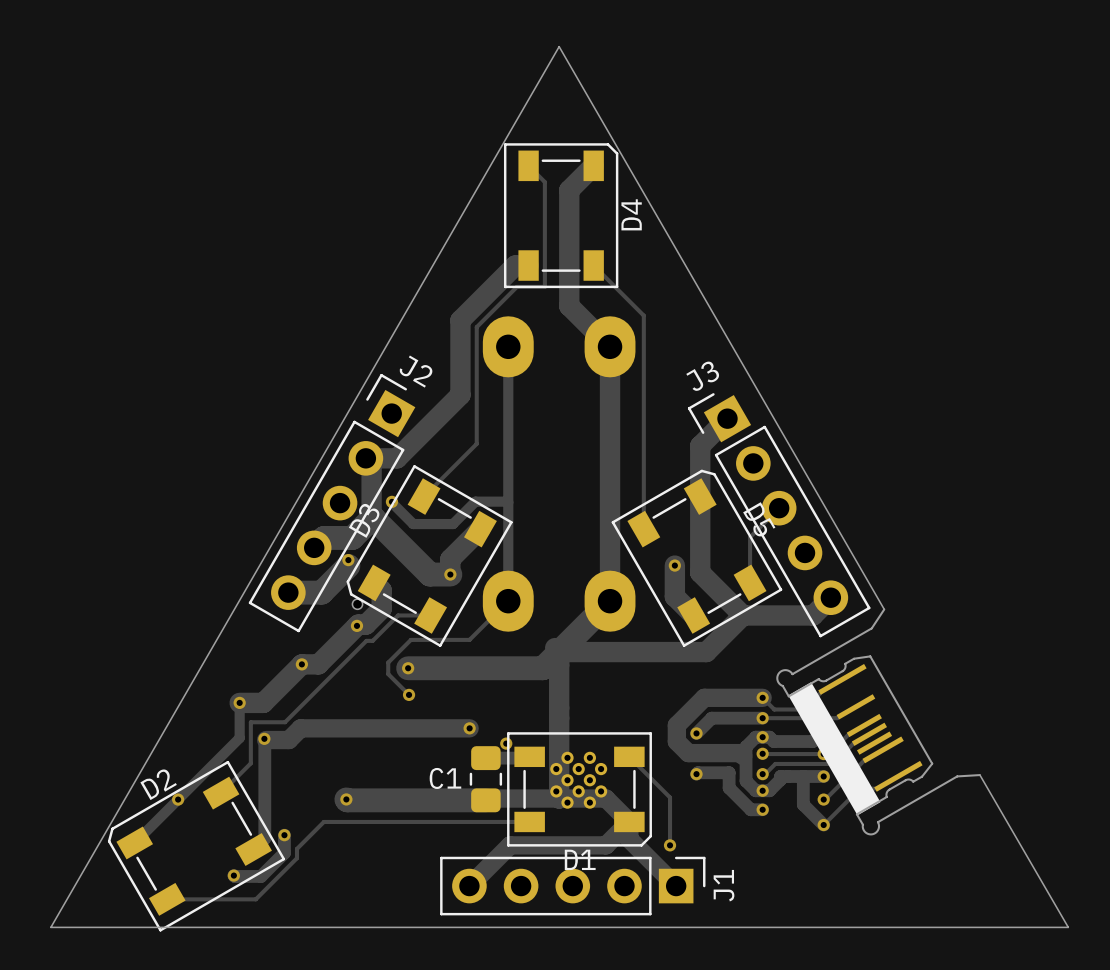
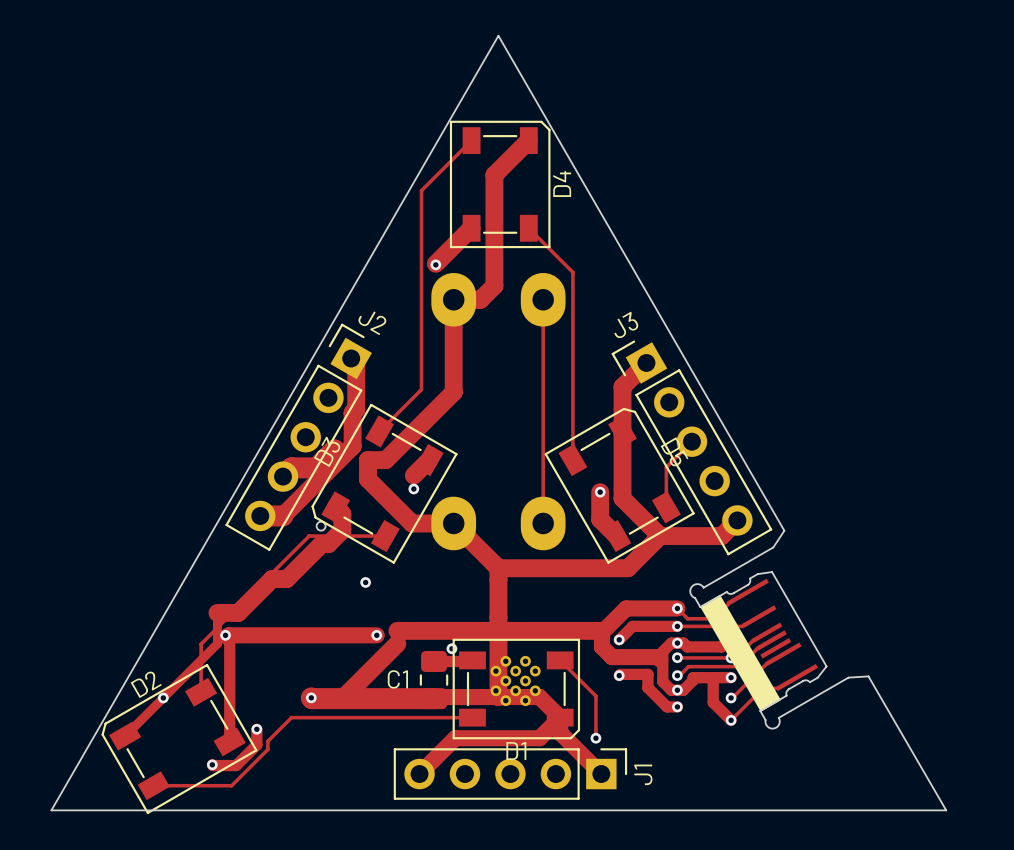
track: (528, 165) (544, 182) (544, 286) (516, 286) (476, 327) (476, 443) (471, 448) -> (471, 140) (421, 190) (421, 389)
track: (569, 190) (569, 306) (610, 346) -> (507, 162) (494, 175) (494, 285) (480, 299) (453, 299)
track: (528, 265) (515, 265) (460, 320) (460, 394) (397, 458) (365, 458) (371, 464) (371, 516) (429, 574) (450, 574) (450, 559) (462, 546) -> (471, 228) (435, 263)
via: none -> (435, 264)
track width: thin (508, 346) (508, 452) (508, 346) -> thick (453, 299) (453, 392) (453, 299)
track width: thick (610, 346) (610, 601) -> thin (543, 299) (543, 523)
track: none -> (453, 392) (385, 460) (367, 460) (367, 479) (412, 523) (453, 523) (494, 564)
track: (391, 501) (413, 524) (453, 524) (475, 501) (508, 502) -> none
via: (391, 501) -> none
via: (348, 560) -> none
track: (348, 565) (321, 592) (314, 592) -> (351, 358) (356, 363) (356, 409) (352, 412) (352, 446) (282, 515)
via position: (450, 574) -> (413, 488)
track: (508, 601) (508, 452) (508, 601) -> none
track: (508, 601) (469, 639) (410, 639) (388, 662) (388, 674) (409, 694) -> none
track: (610, 601) (542, 668) (408, 668) -> none
track: (398, 615) (372, 640) (366, 640) (285, 722) (250, 722) (250, 763) (221, 793) -> (356, 536) (309, 536) (201, 644) (201, 692)
via: (356, 625) -> none
via: (301, 664) -> none
via: (409, 694) -> none
via: (239, 702) -> none
track: none -> (397, 630) (600, 630) (601, 632)
via: none -> (225, 635)
track: (300, 728) (288, 740) (266, 740) -> (271, 635) (228, 635) (227, 637)
track: (420, 728) (469, 728) -> none
via: none -> (376, 635)
via: (469, 728) -> none
track: none -> (397, 643) (343, 697)
track: (264, 738) (264, 838) (253, 849) -> (225, 635) (229, 639) (229, 741)
via: (264, 738) -> none

